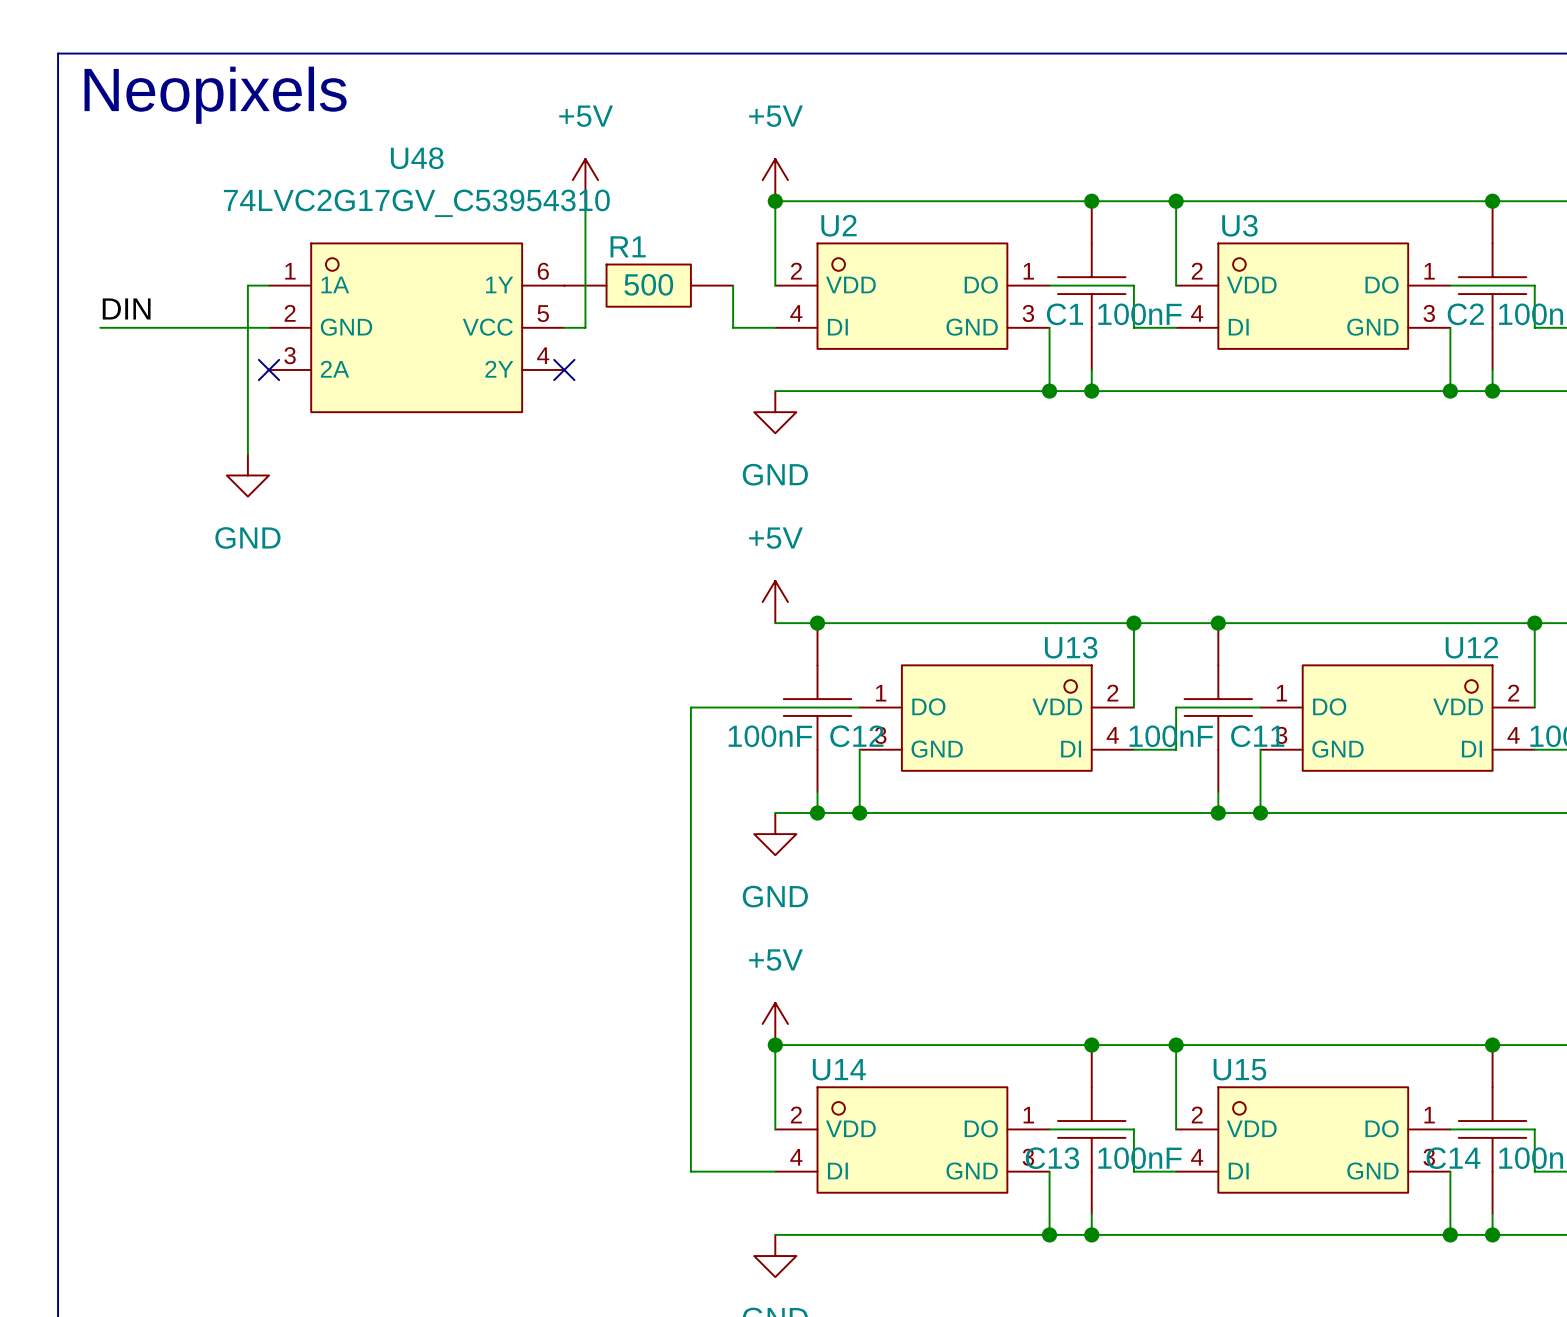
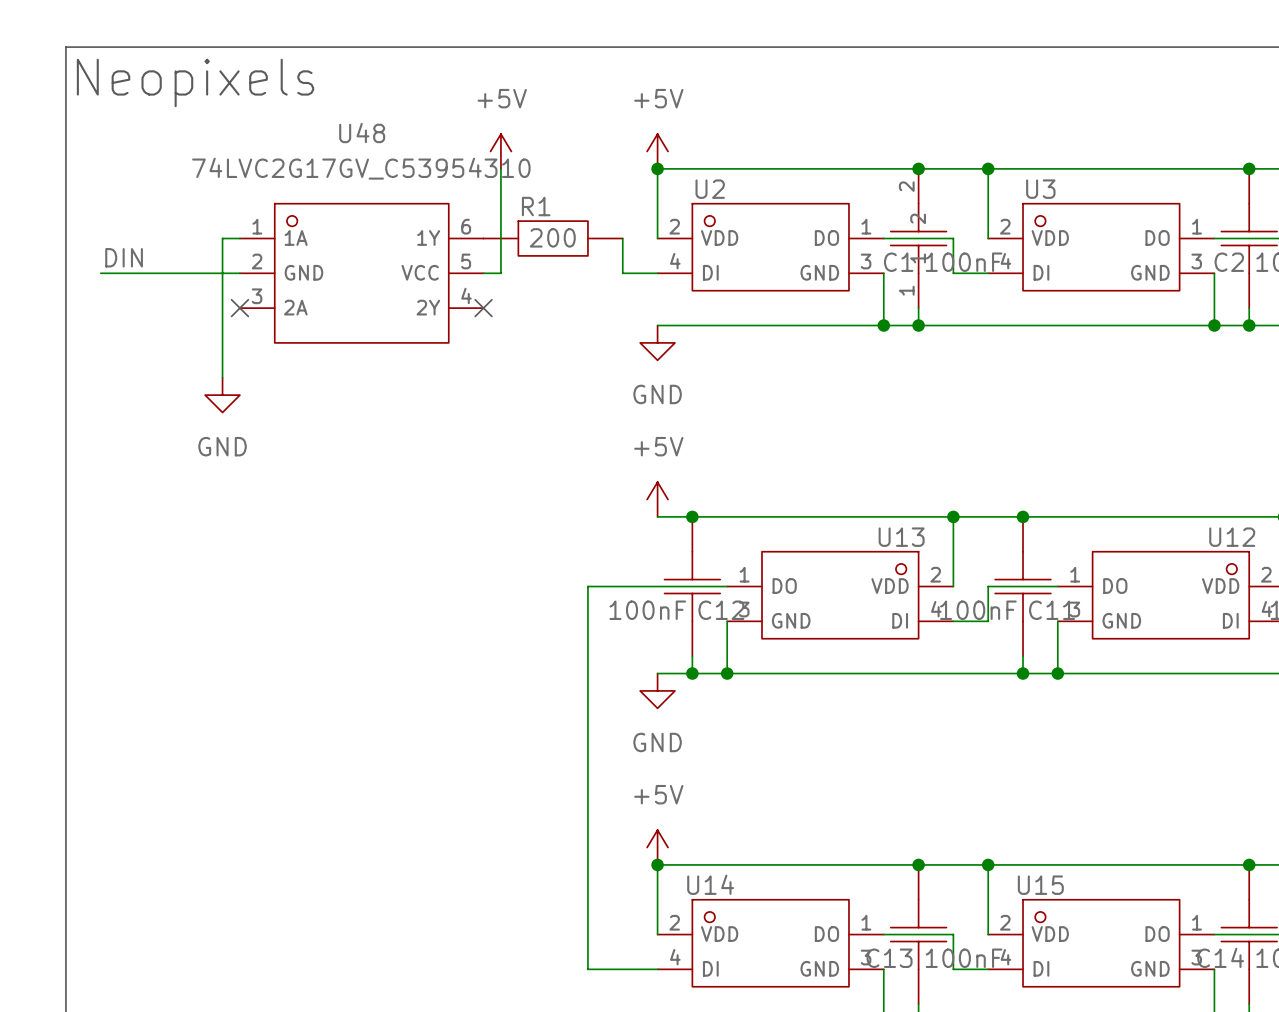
C1 pin number: none -> 2 (906, 186)
C1 pin name: none -> 2 (918, 218)
R1 value: 500 (648, 284) -> 200 (552, 237)
C1 pin name: none -> 1 (918, 258)
C1 pin number: none -> 1 (906, 290)

